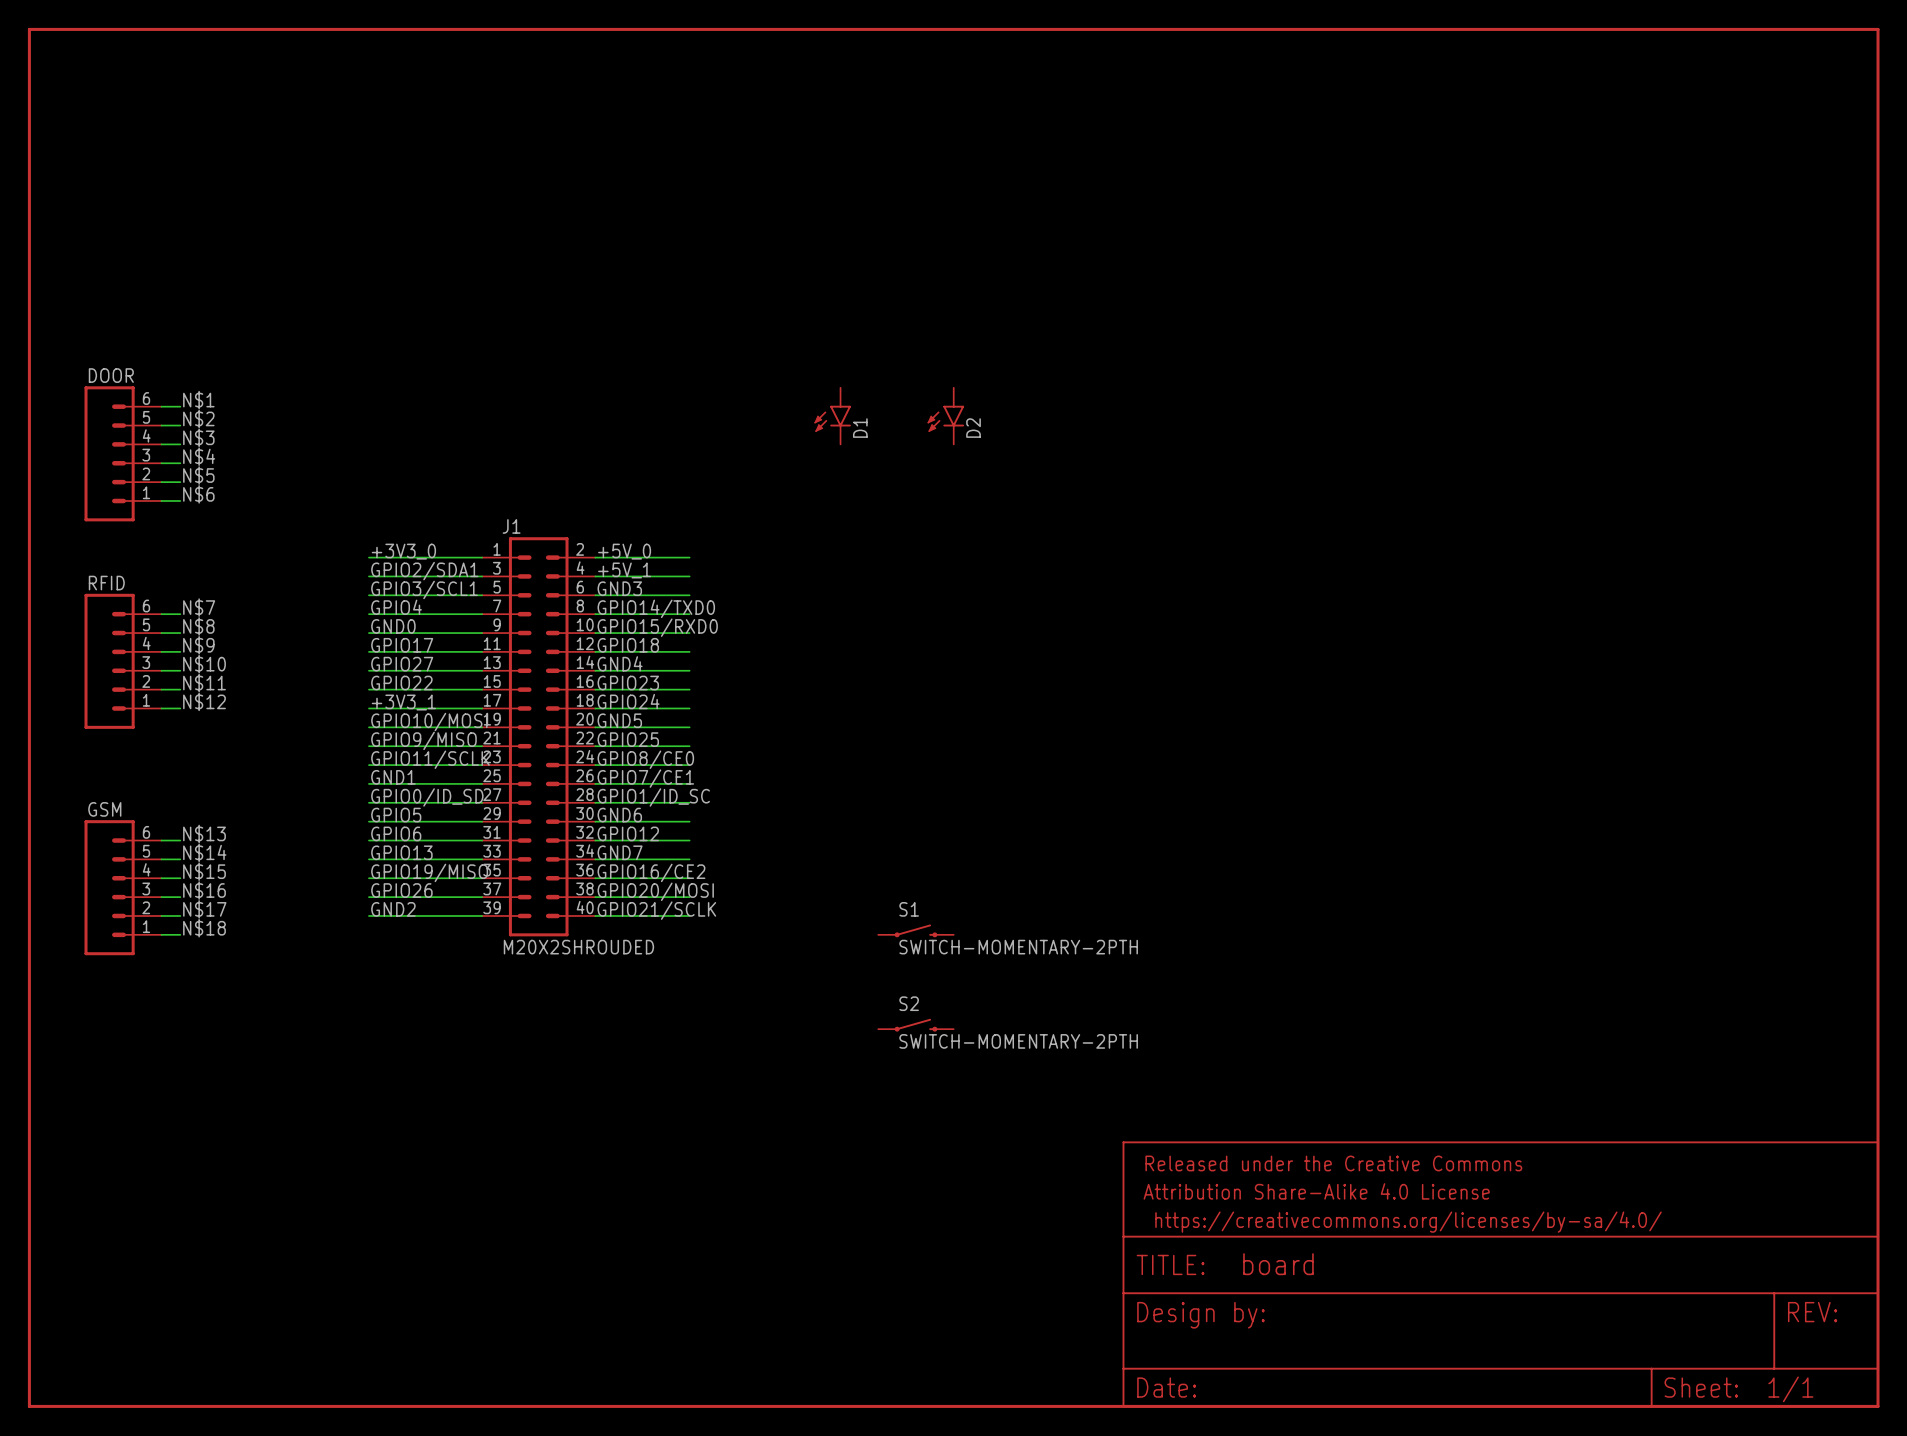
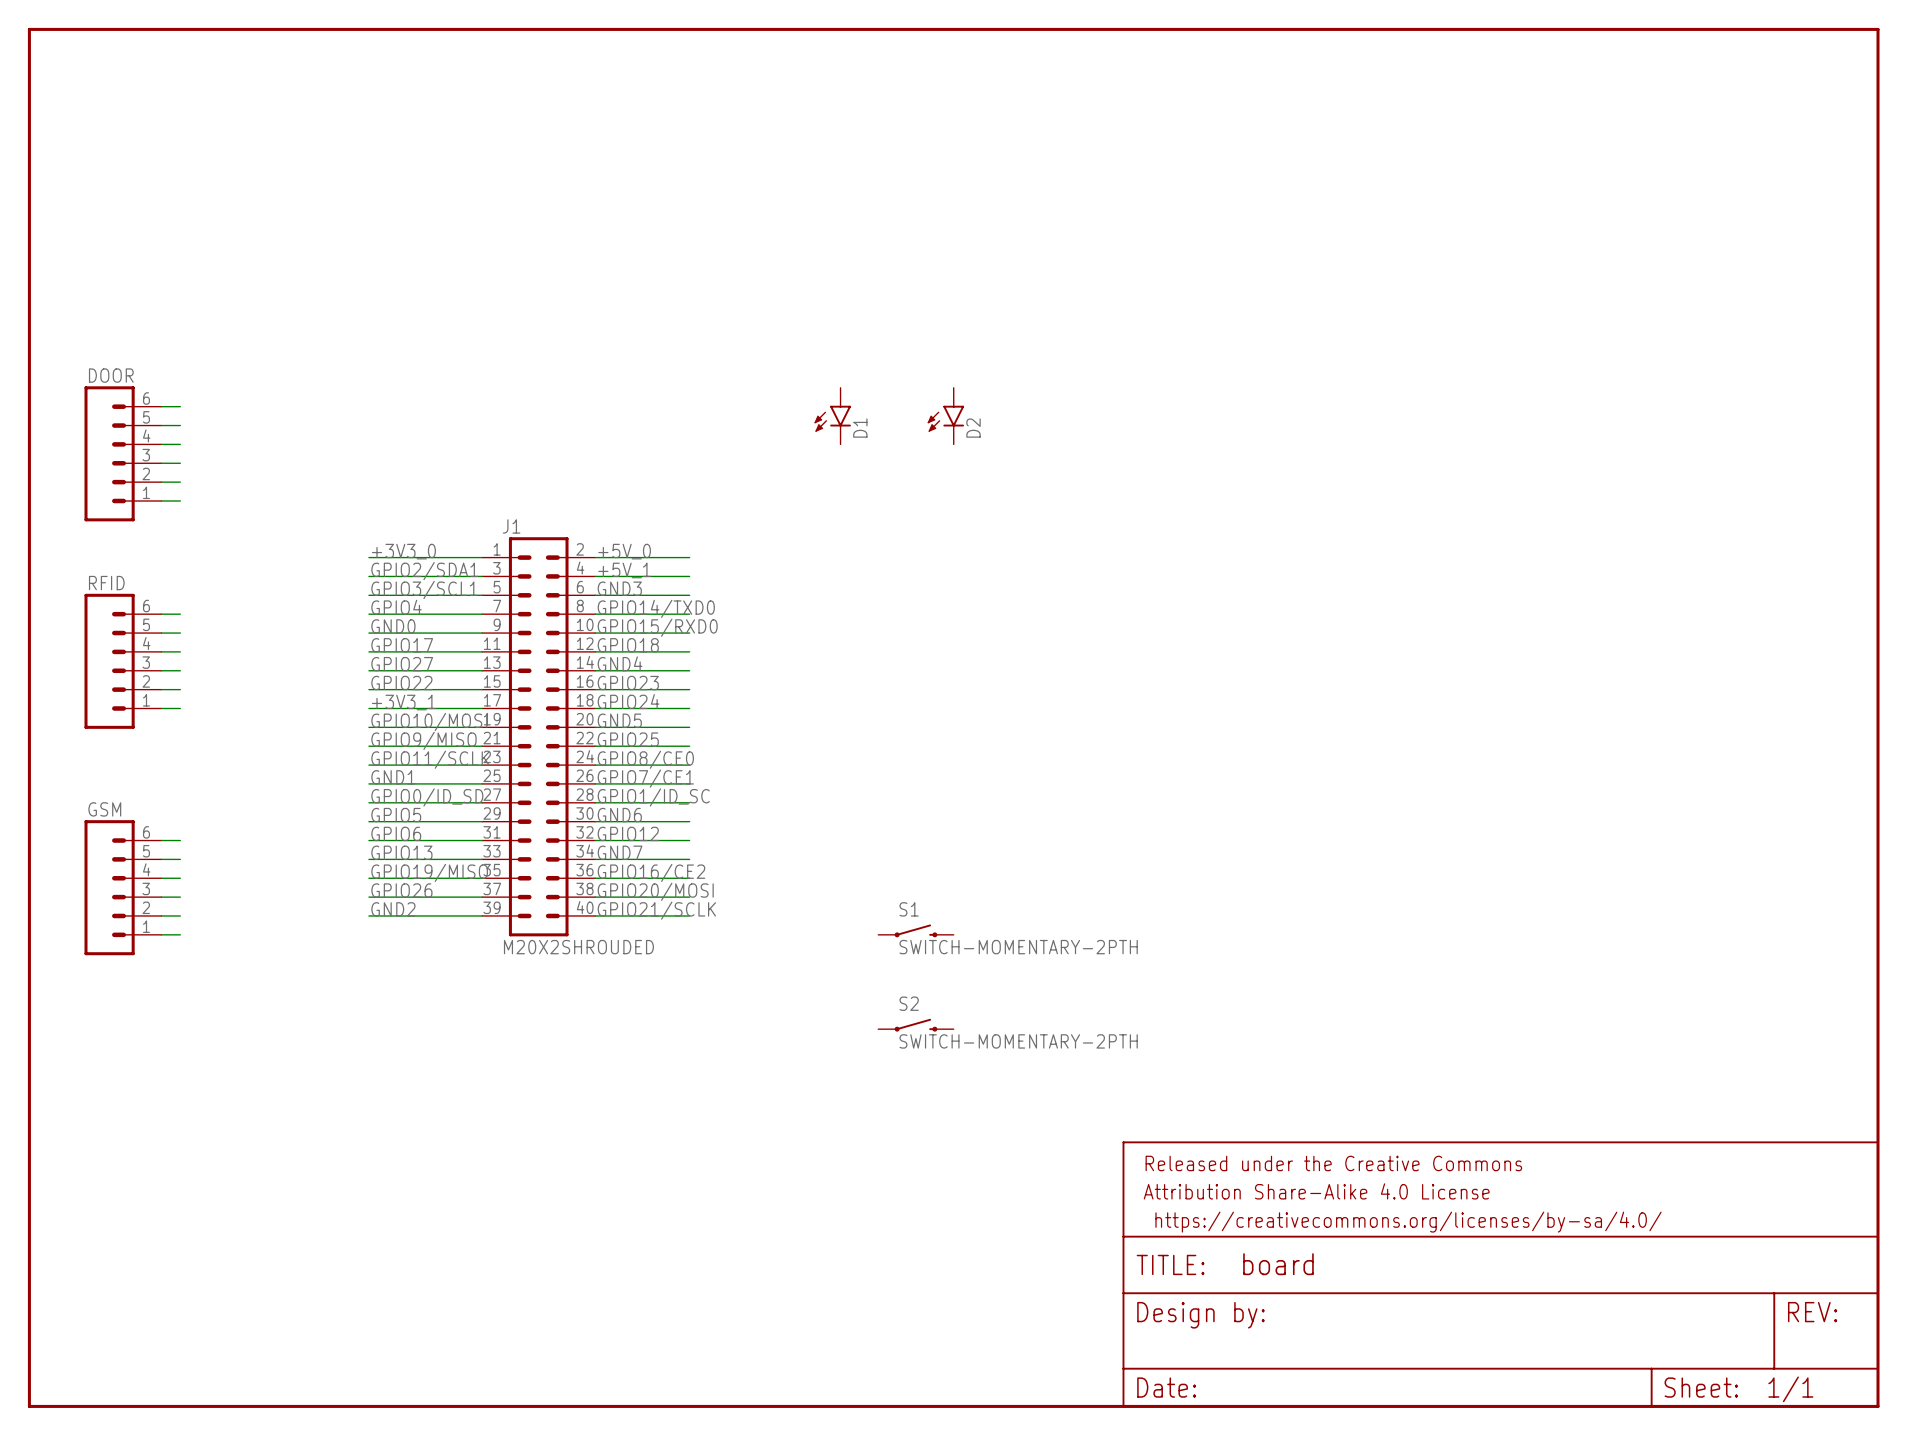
label: N$1 (198, 400) -> none
label: N$2 (198, 418) -> none
label: N$3 (198, 437) -> none
label: N$4 (199, 456) -> none
label: N$5 (198, 475) -> none
label: N$6 (198, 494) -> none
label: N$7 (199, 607) -> none
label: N$8 (198, 626) -> none
label: N$9 (198, 645) -> none
label: N$10 (204, 664) -> none
label: N$11 (204, 683) -> none
label: N$12 (204, 701) -> none
label: N$13 (204, 833) -> none
label: N$14 (204, 852) -> none
label: N$15 (204, 871) -> none
label: N$16 (204, 890) -> none
label: N$17 (204, 909) -> none
label: N$18 (204, 928) -> none

